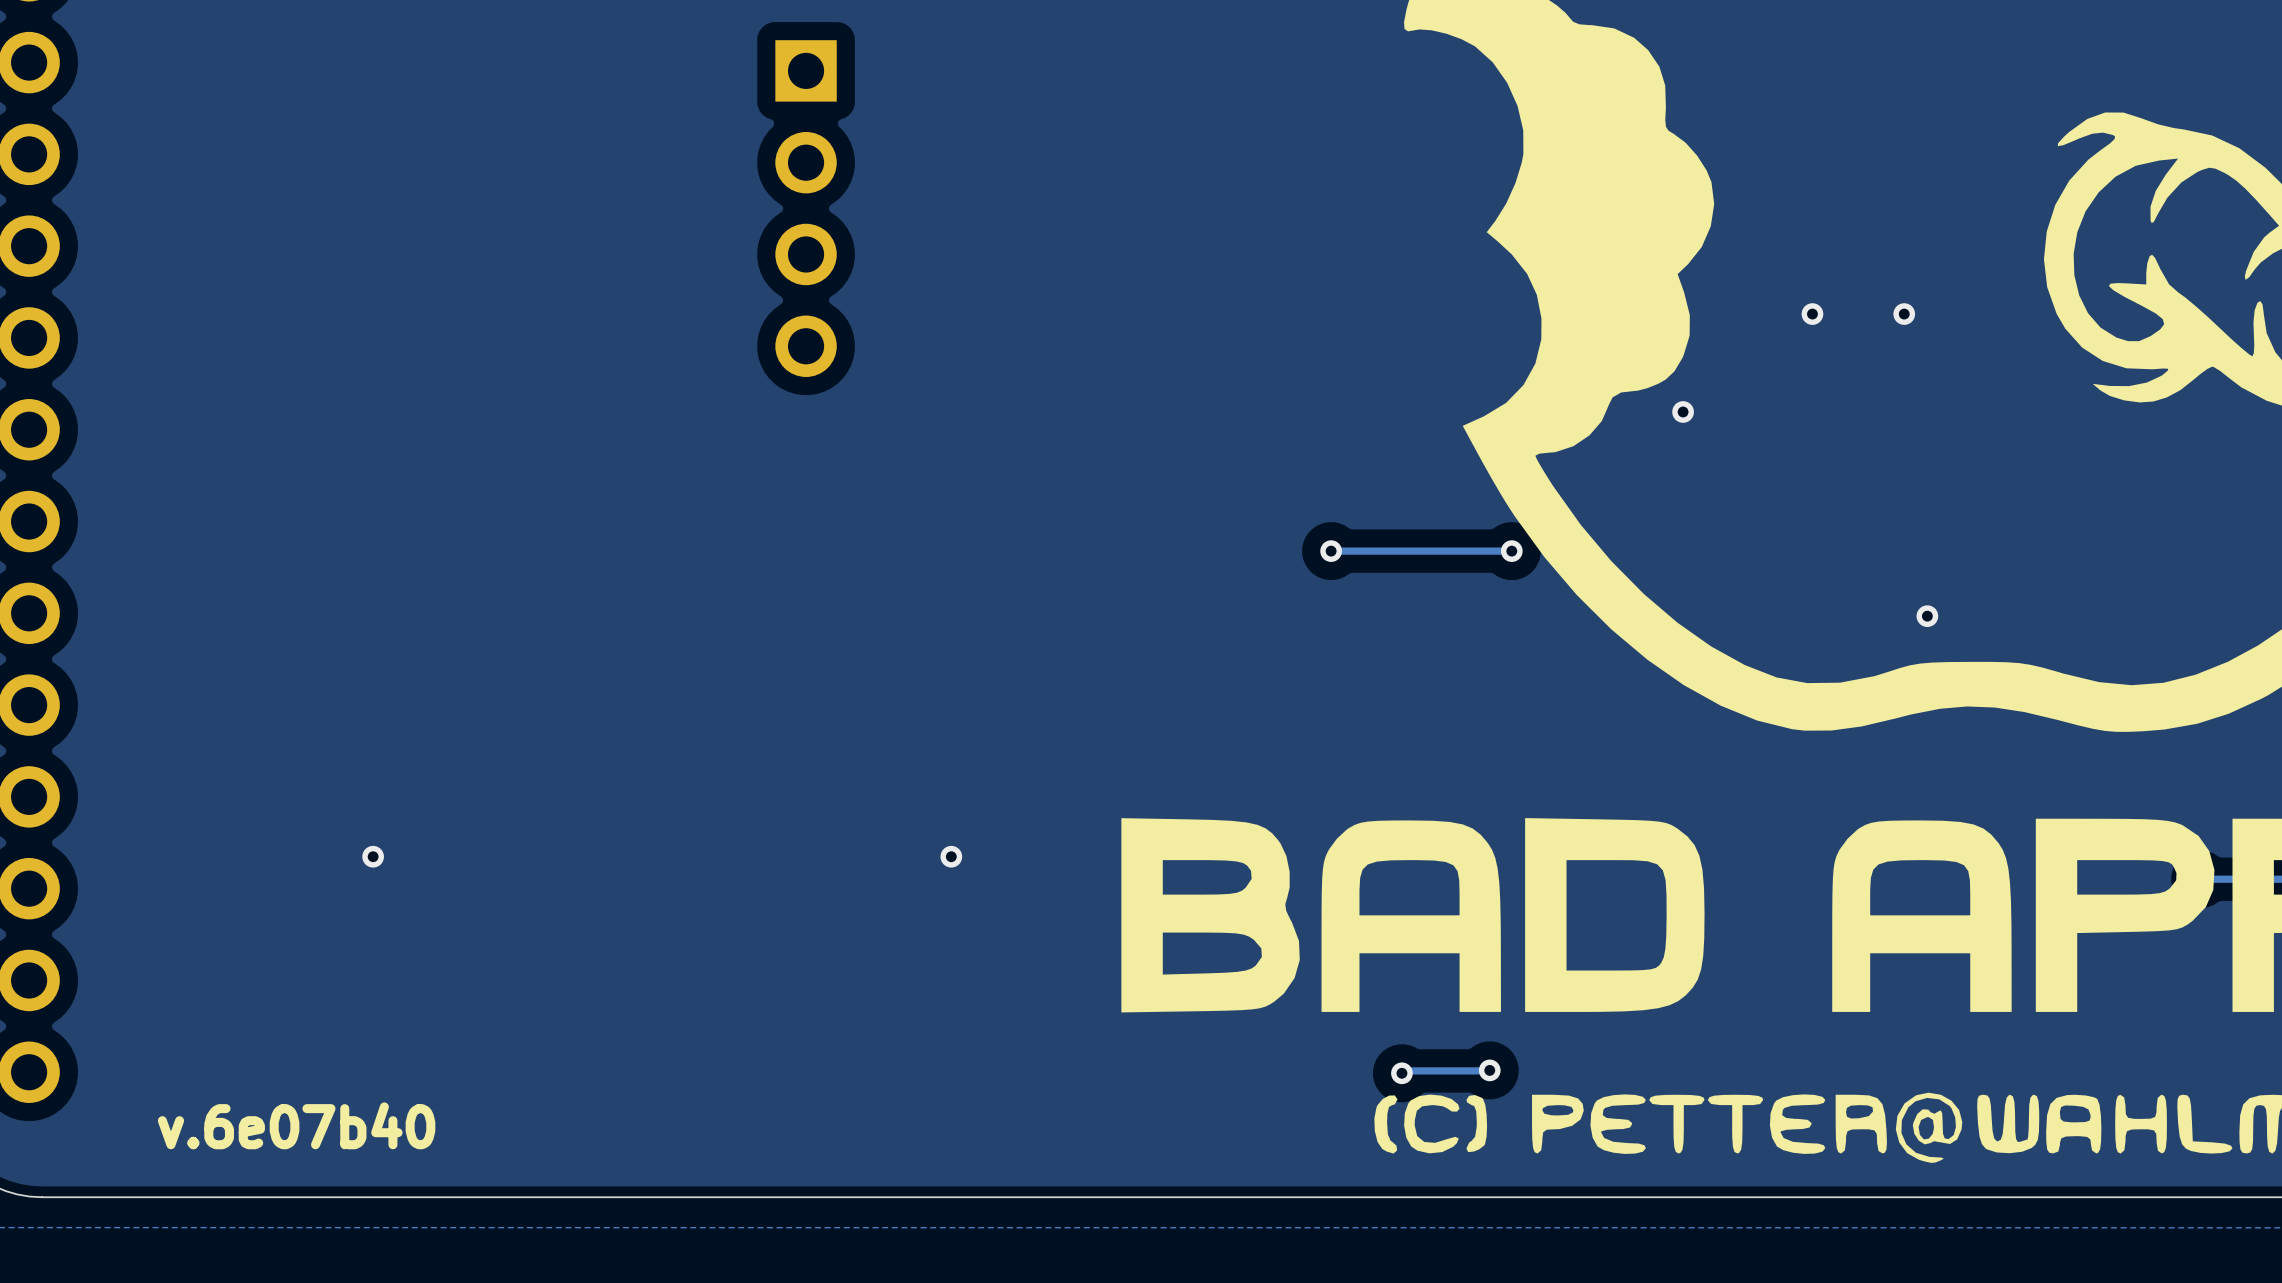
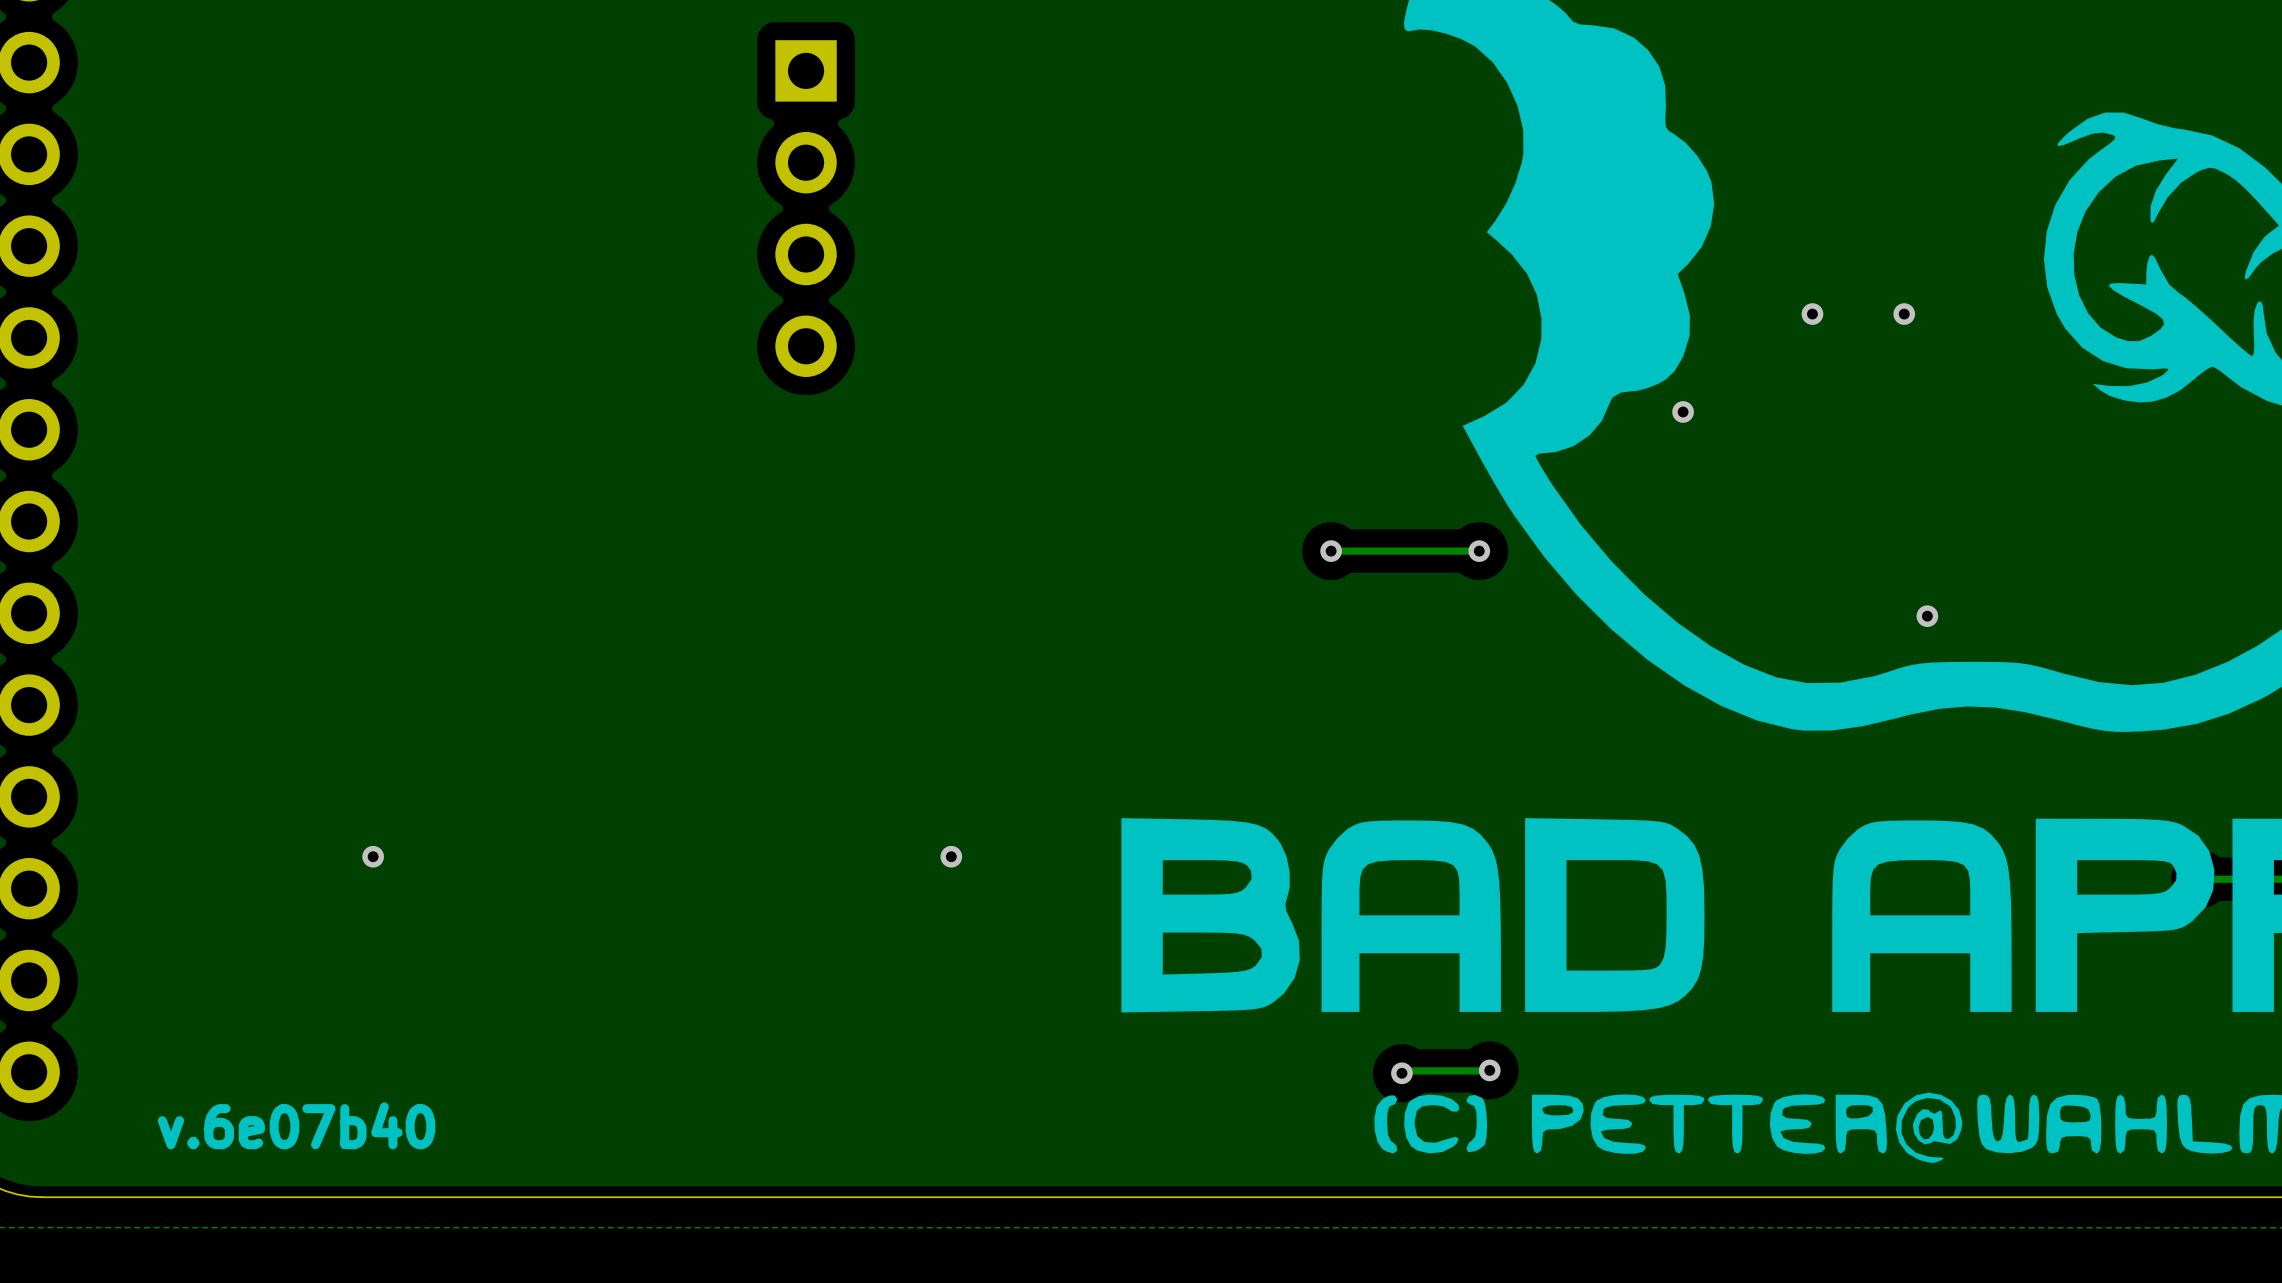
track: (1511, 551) (1479, 551) -> none
via position: (1511, 551) -> (1479, 551)

